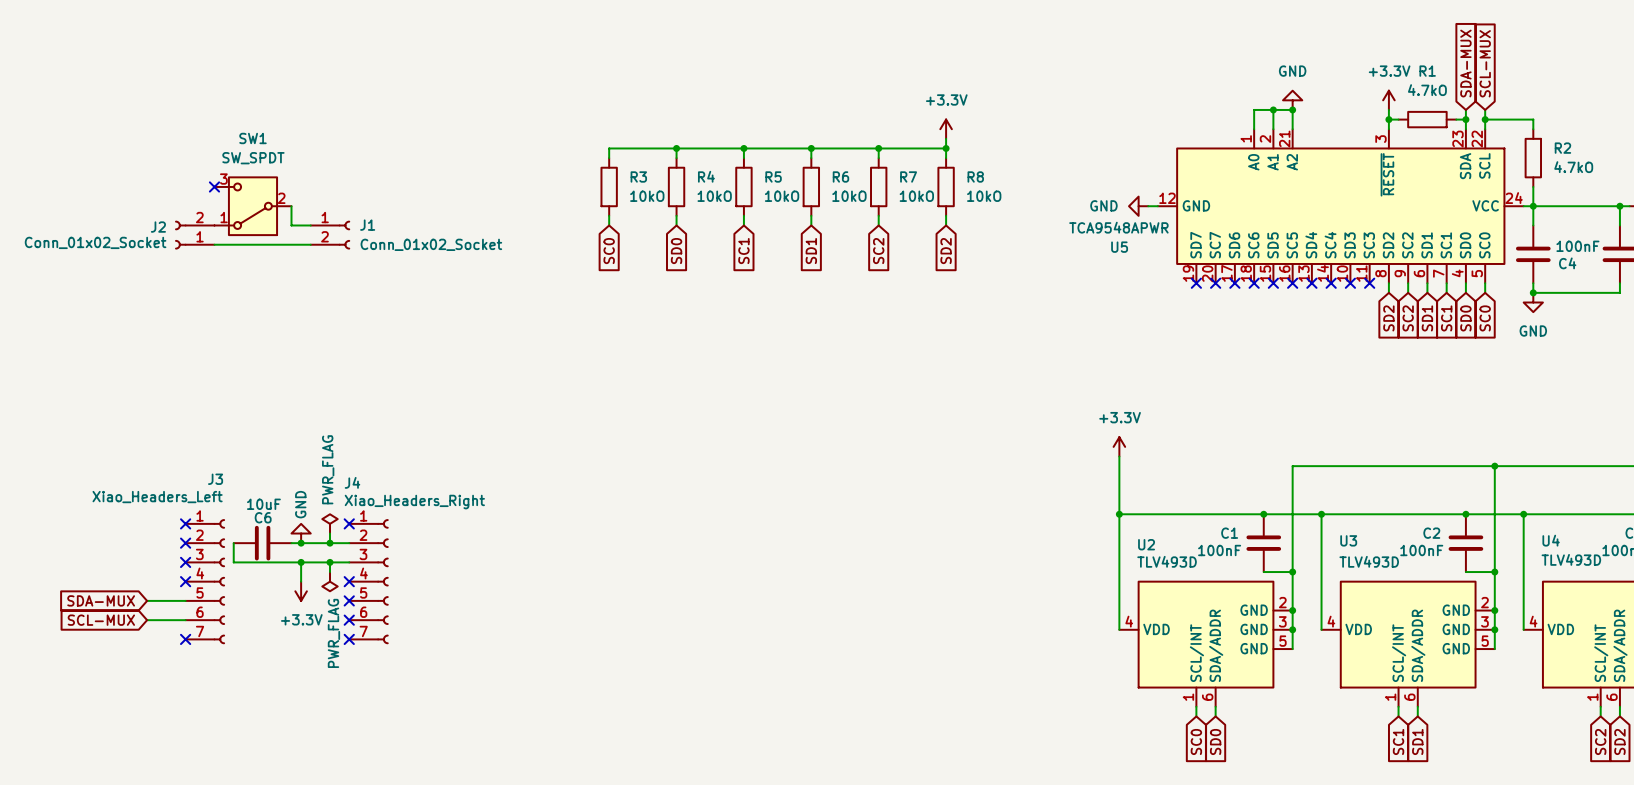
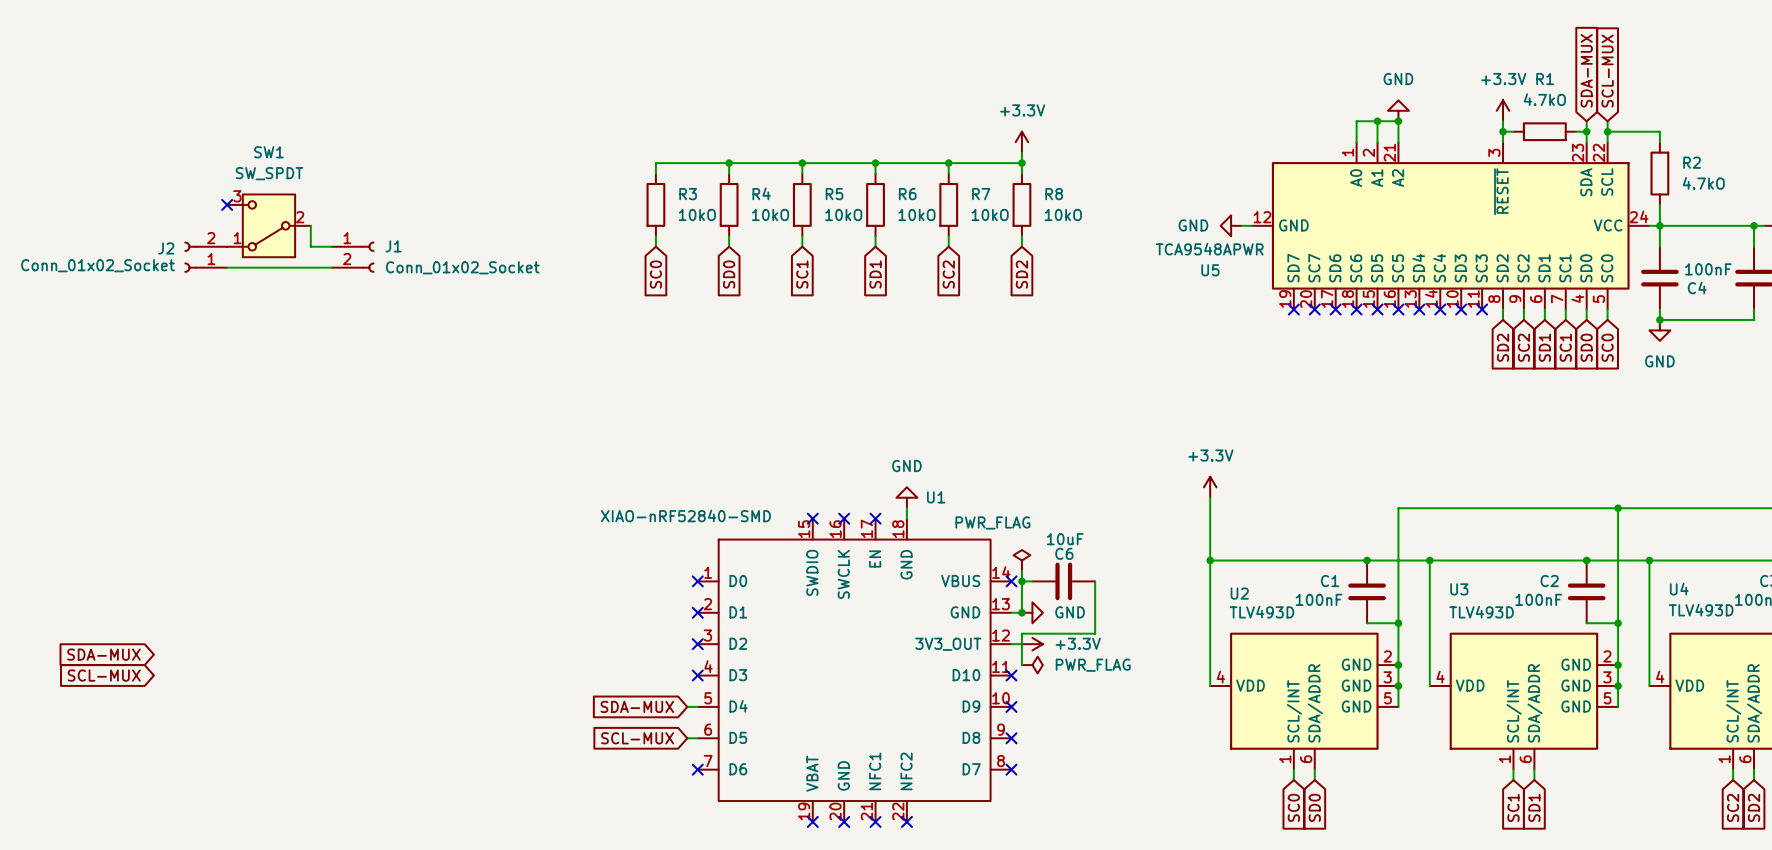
power symbol: none -> GND (906, 497)
wire: none -> (906, 508) (906, 518)
no-connect mark: none -> (812, 518)
no-connect mark: none -> (844, 518)
no-connect mark: none -> (875, 518)
power symbol: none -> PWR_FLAG (1021, 560)
no-connect mark: (185, 523) -> none
power symbol: PWR_FLAG (330, 523) -> none
no-connect mark: (349, 523) -> none
wire: none -> (1021, 570) (1021, 612) (1011, 612)
power symbol: GND (301, 533) -> none
wire: (330, 533) (330, 543) -> none
no-connect mark: none -> (697, 581)
no-connect mark: none -> (1011, 581)
wire: none -> (1021, 581) (1032, 581)
junction: none -> (1021, 581)
wire: none -> (1095, 581) (1095, 633) (1021, 633) (1021, 665)
no-connect mark: (185, 543) -> none
wire: (233, 543) (233, 562) (349, 562) -> none
C6 position: (262, 543) -> (1063, 581)
wire: (291, 543) (349, 543) -> none
junction: (301, 543) -> none
junction: (330, 543) -> none
no-connect mark: (185, 562) -> none
wire: (301, 562) (301, 581) -> none
junction: (301, 562) -> none
wire: (330, 562) (330, 572) -> none
junction: (330, 562) -> none
no-connect mark: none -> (697, 612)
junction: none -> (1021, 612)
power symbol: none -> GND (1032, 612)
no-connect mark: (185, 581) -> none
J3: Xiao_Headers_Left (205, 581) -> none
power symbol: PWR_FLAG (330, 581) -> none
no-connect mark: (349, 581) -> none
J4: Xiao_Headers_Right (368, 581) -> none
power symbol: +3.3V (301, 591) -> none
no-connect mark: none -> (697, 644)
wire: none -> (1011, 644) (1021, 644)
power symbol: none -> +3.3V (1032, 644)
wire: (147, 600) (185, 600) -> none
no-connect mark: (349, 600) -> none
power symbol: none -> PWR_FLAG (1032, 665)
U1: none -> XIAO-nRF52840-SMD (854, 670)
wire: (147, 620) (185, 620) -> none
no-connect mark: (349, 620) -> none
no-connect mark: none -> (697, 675)
no-connect mark: none -> (1011, 675)
no-connect mark: (185, 639) -> none
no-connect mark: (349, 639) -> none
global label: none -> SDA-MUX (637, 706)
wire: none -> (687, 706) (697, 706)
no-connect mark: none -> (1011, 706)
global label: none -> SCL-MUX (637, 738)
wire: none -> (687, 738) (697, 738)
no-connect mark: none -> (1011, 738)
no-connect mark: none -> (697, 769)
no-connect mark: none -> (1011, 769)
no-connect mark: none -> (812, 821)
no-connect mark: none -> (844, 821)
no-connect mark: none -> (875, 821)
no-connect mark: none -> (906, 821)

